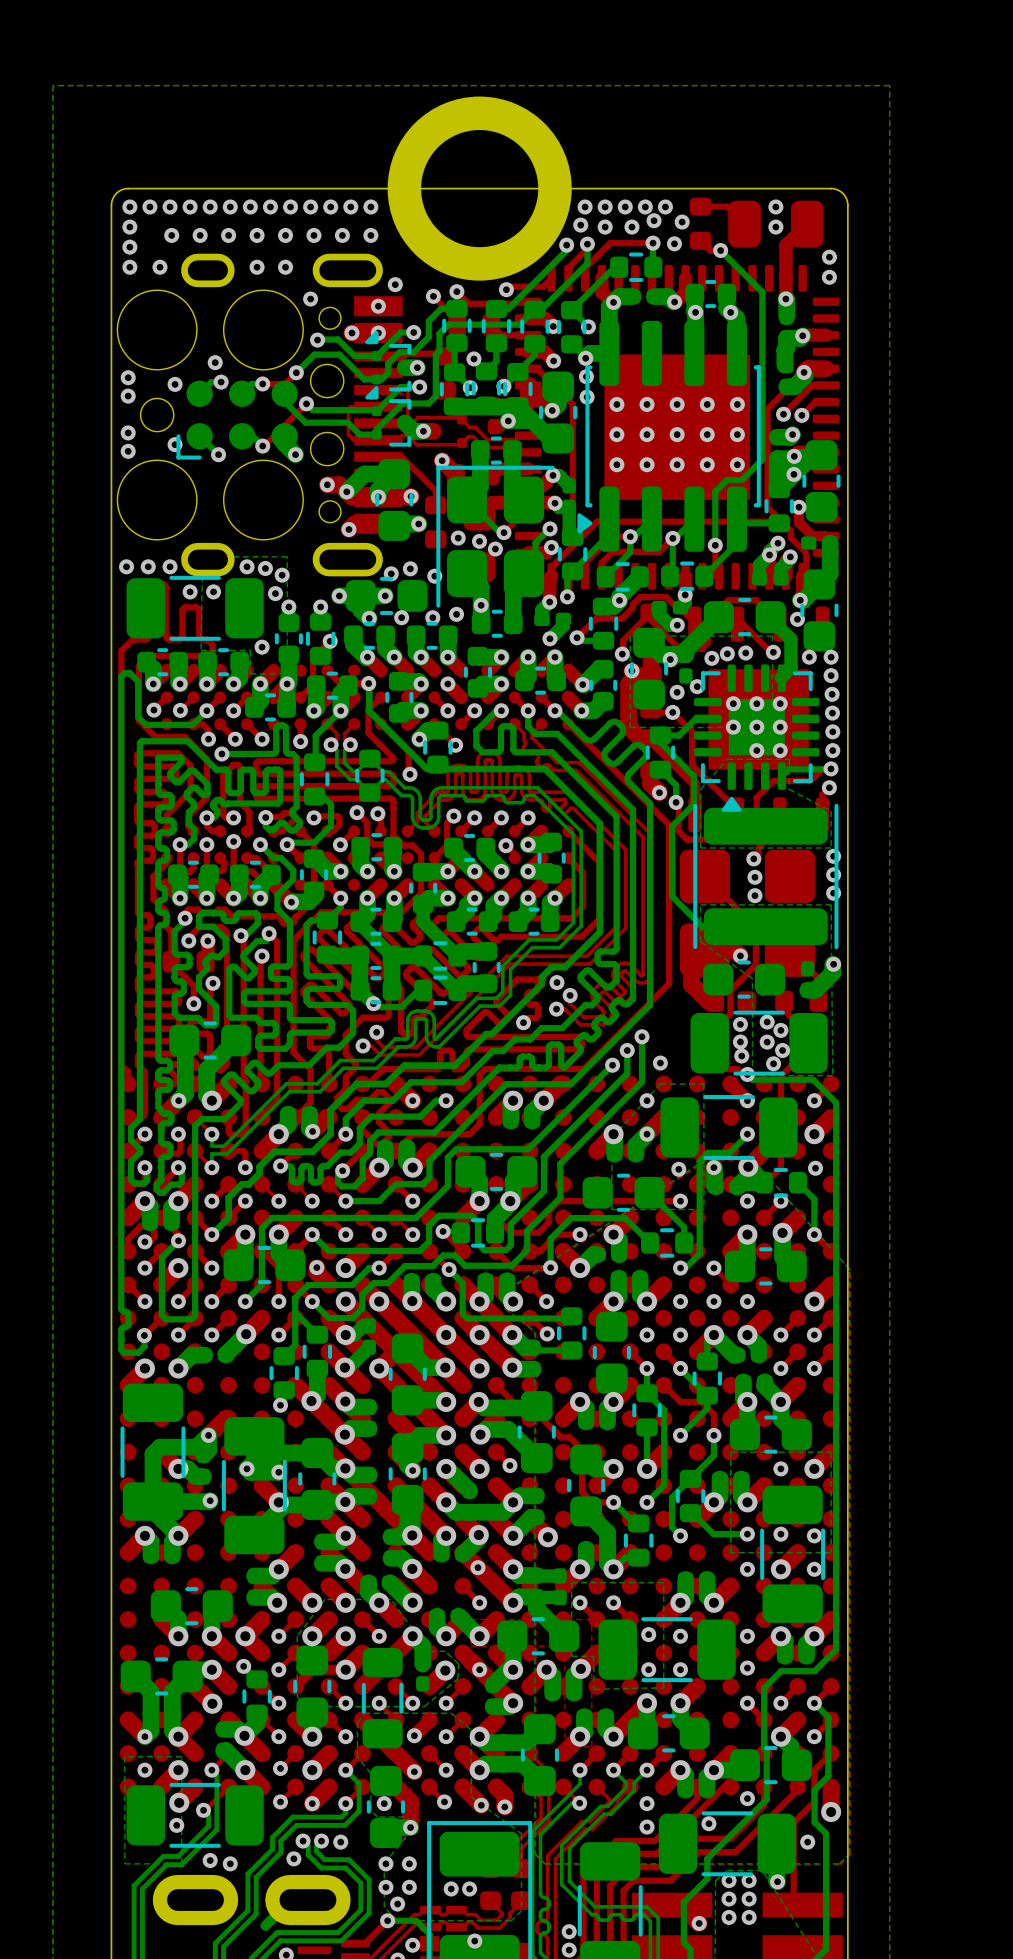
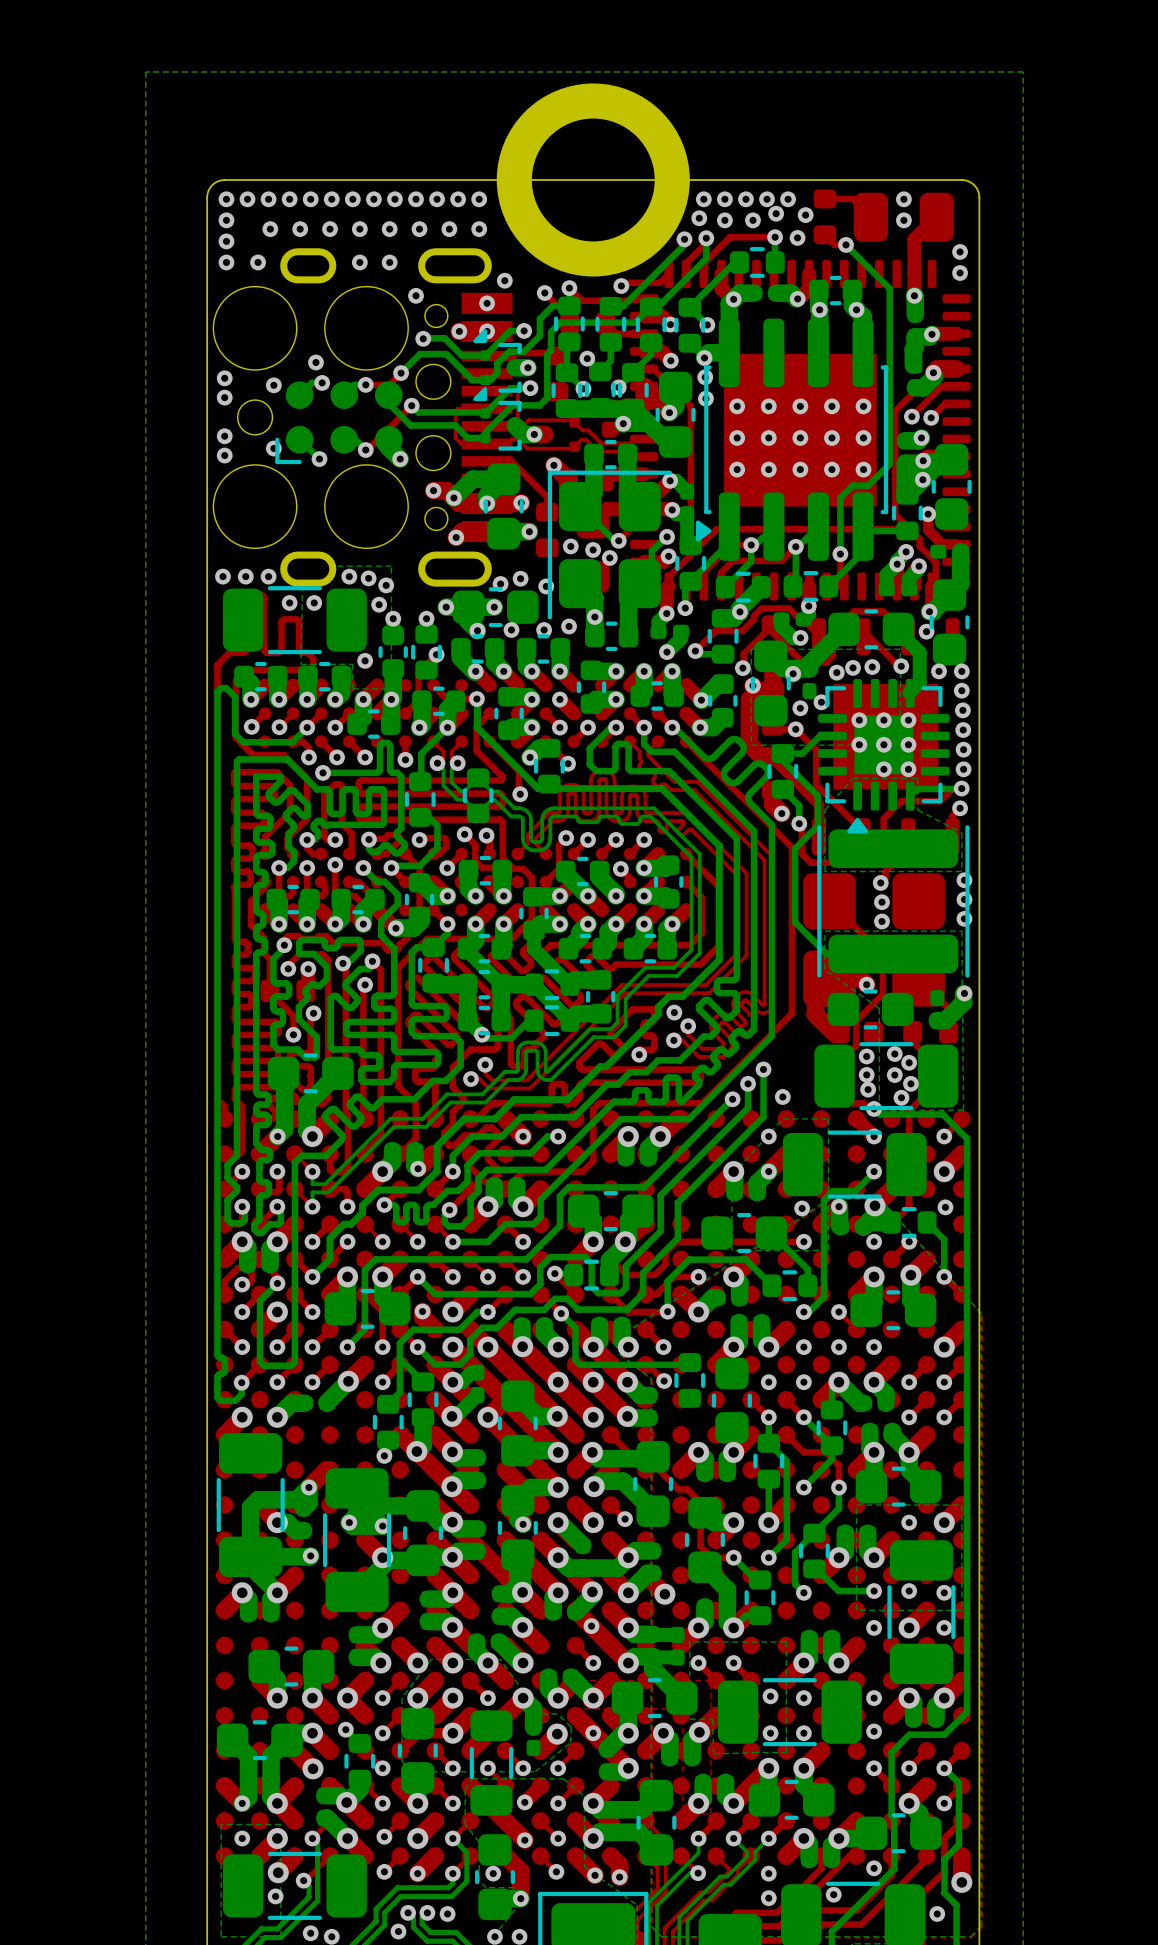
bottom track: (571, 1350) (527, 1350) -> none

